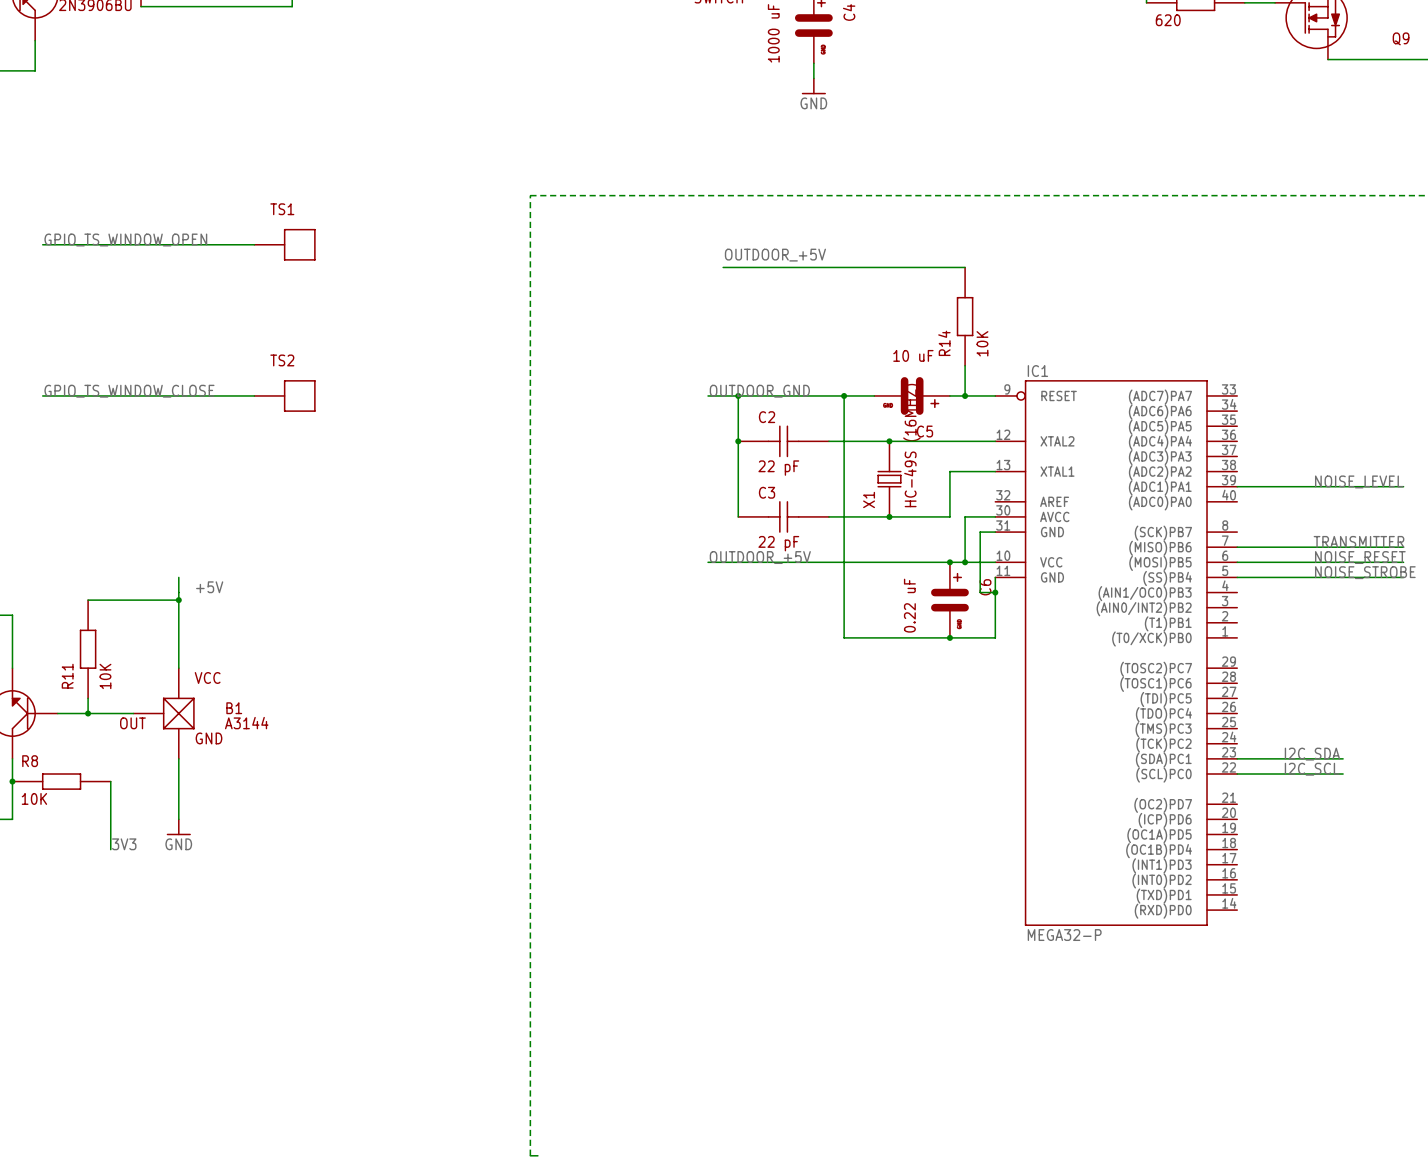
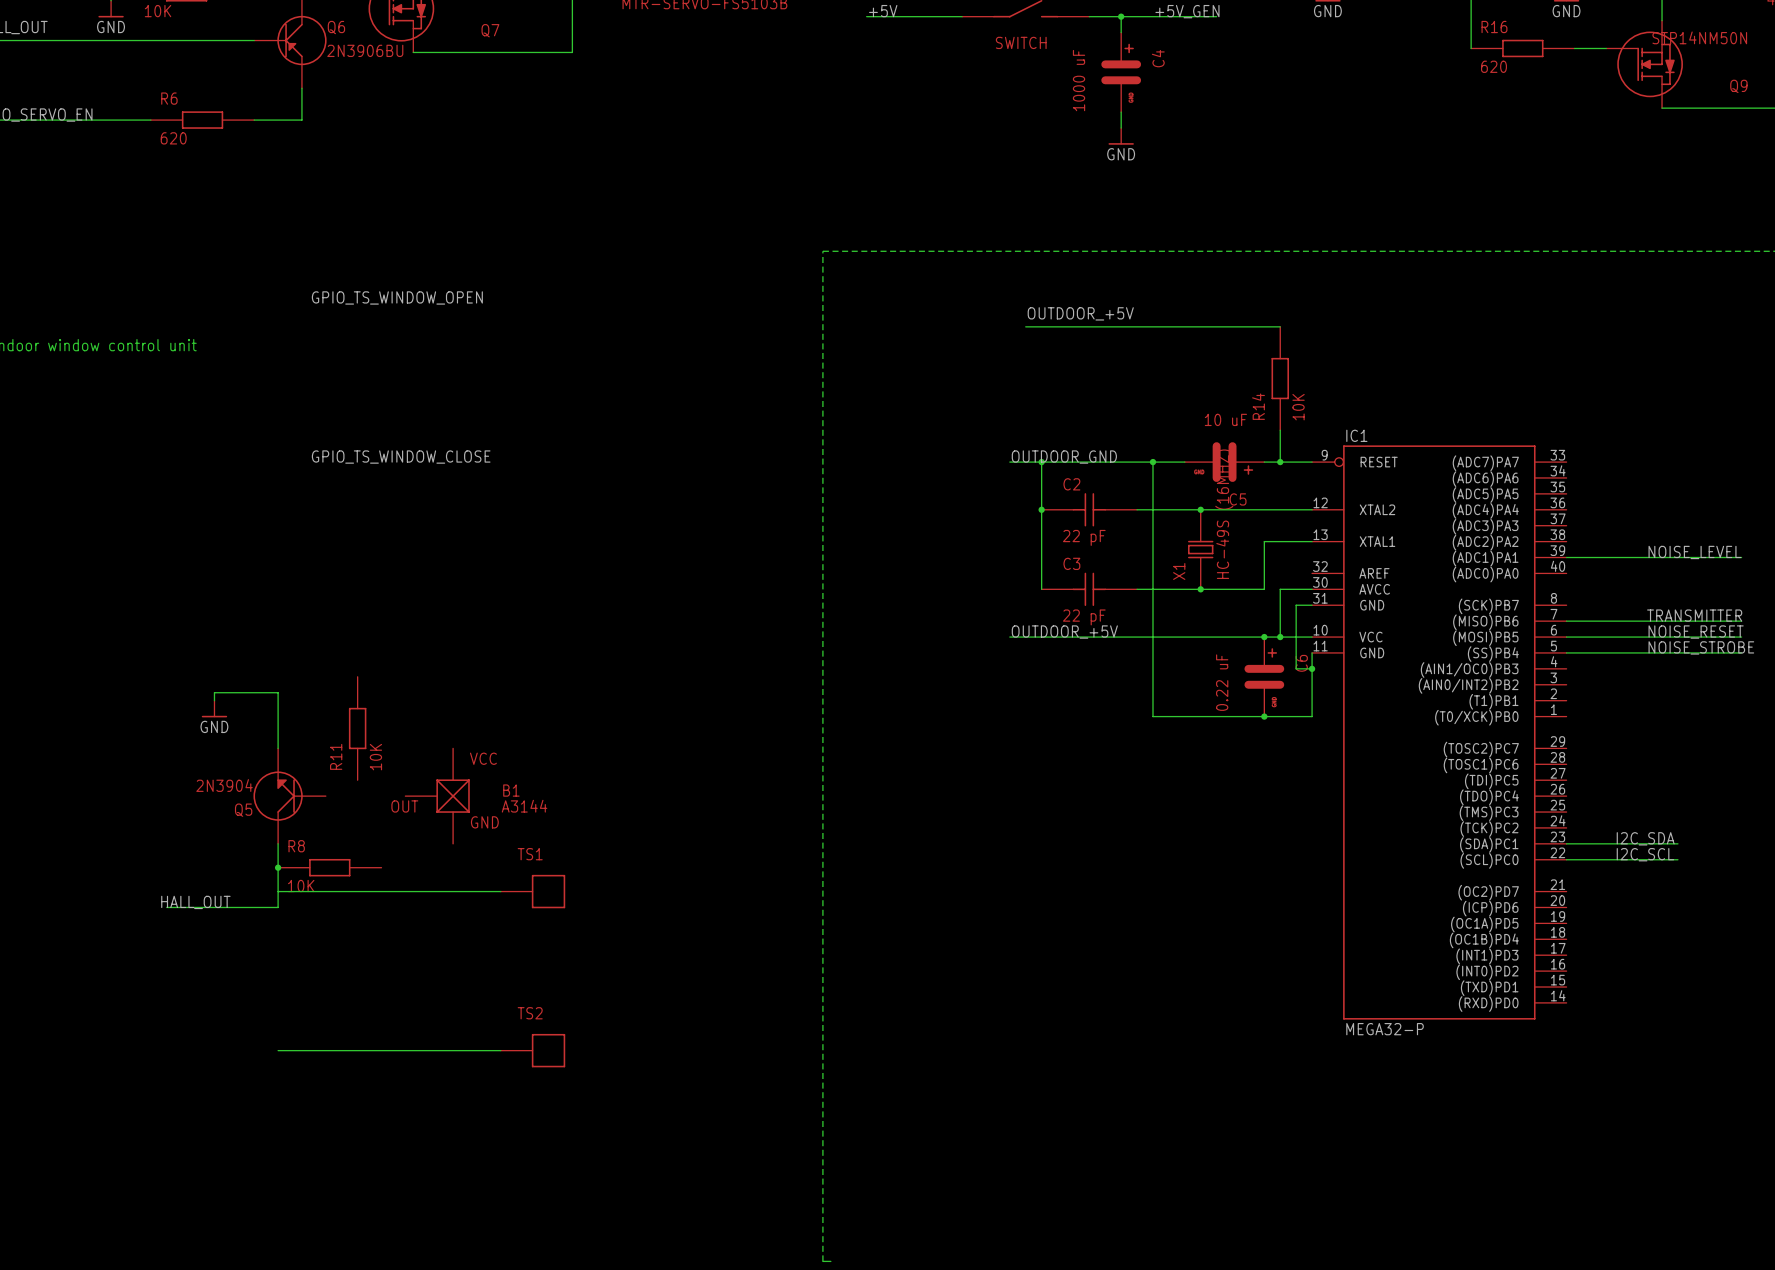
wire: (42, 244) (254, 244) -> none
TS1 position: (285, 244) -> (533, 891)
wire: (42, 395) (254, 395) -> none
TS2 position: (285, 395) -> (533, 1050)
wire: (178, 577) (178, 668) -> none
label: +5V (209, 587) -> none
wire: (88, 600) (178, 600) -> none
junction: (178, 600) -> none
wire: (88, 698) (88, 713) -> none
wire: (57, 713) (133, 713) -> none
junction: (88, 713) -> none
wire: (178, 758) (178, 819) -> none
wire: (110, 781) (110, 849) -> none
wire: none -> (278, 891) (500, 891)
power symbol: GND (178, 827) -> none
label: 3V3 (124, 844) -> none
wire: none -> (278, 1050) (500, 1050)

